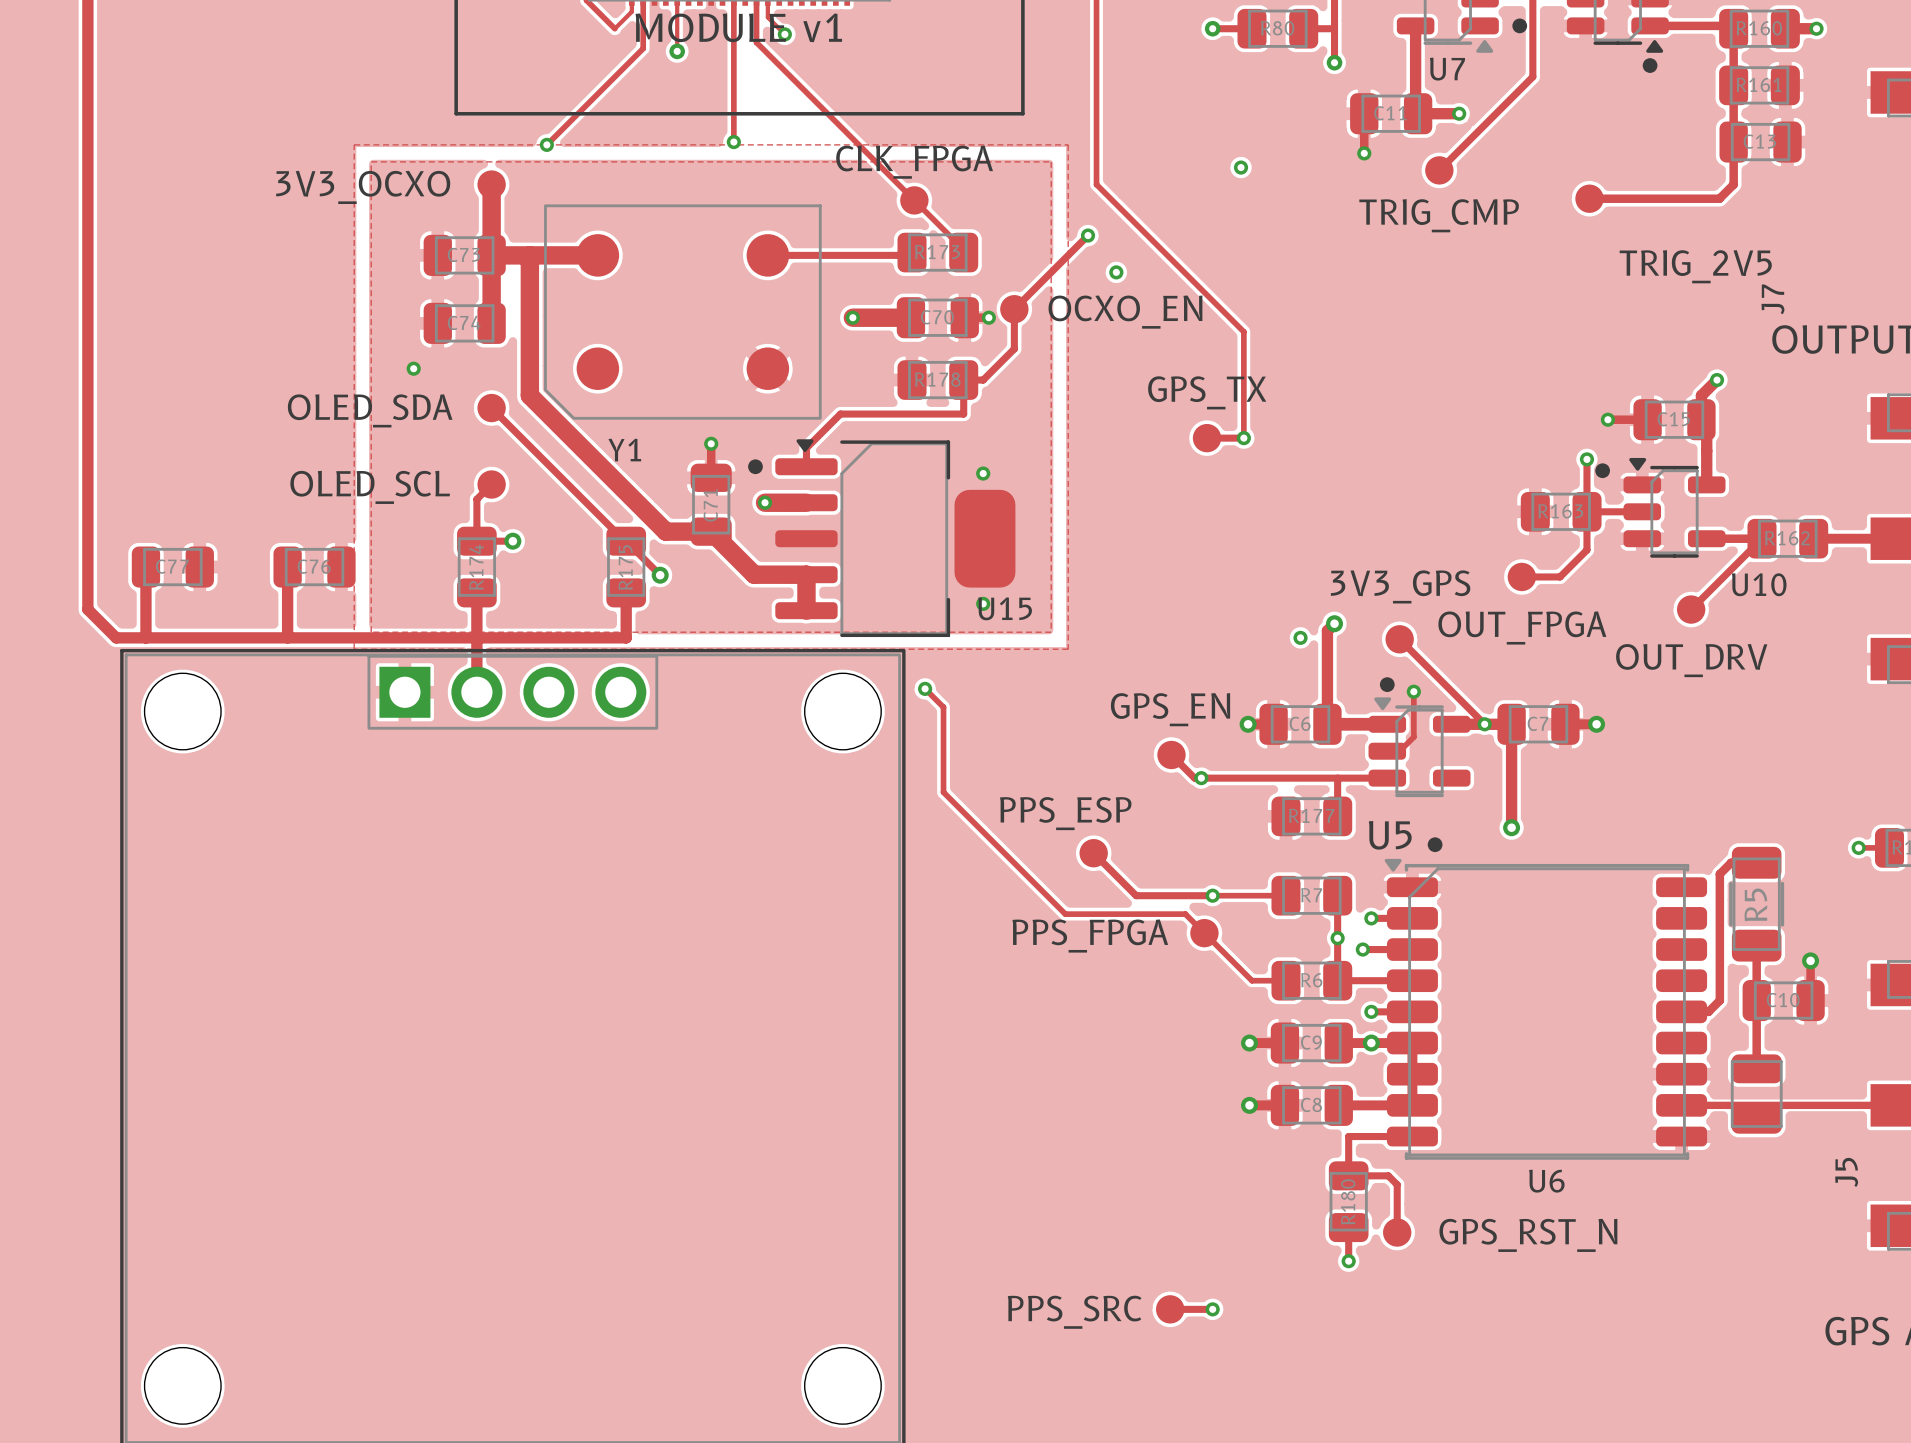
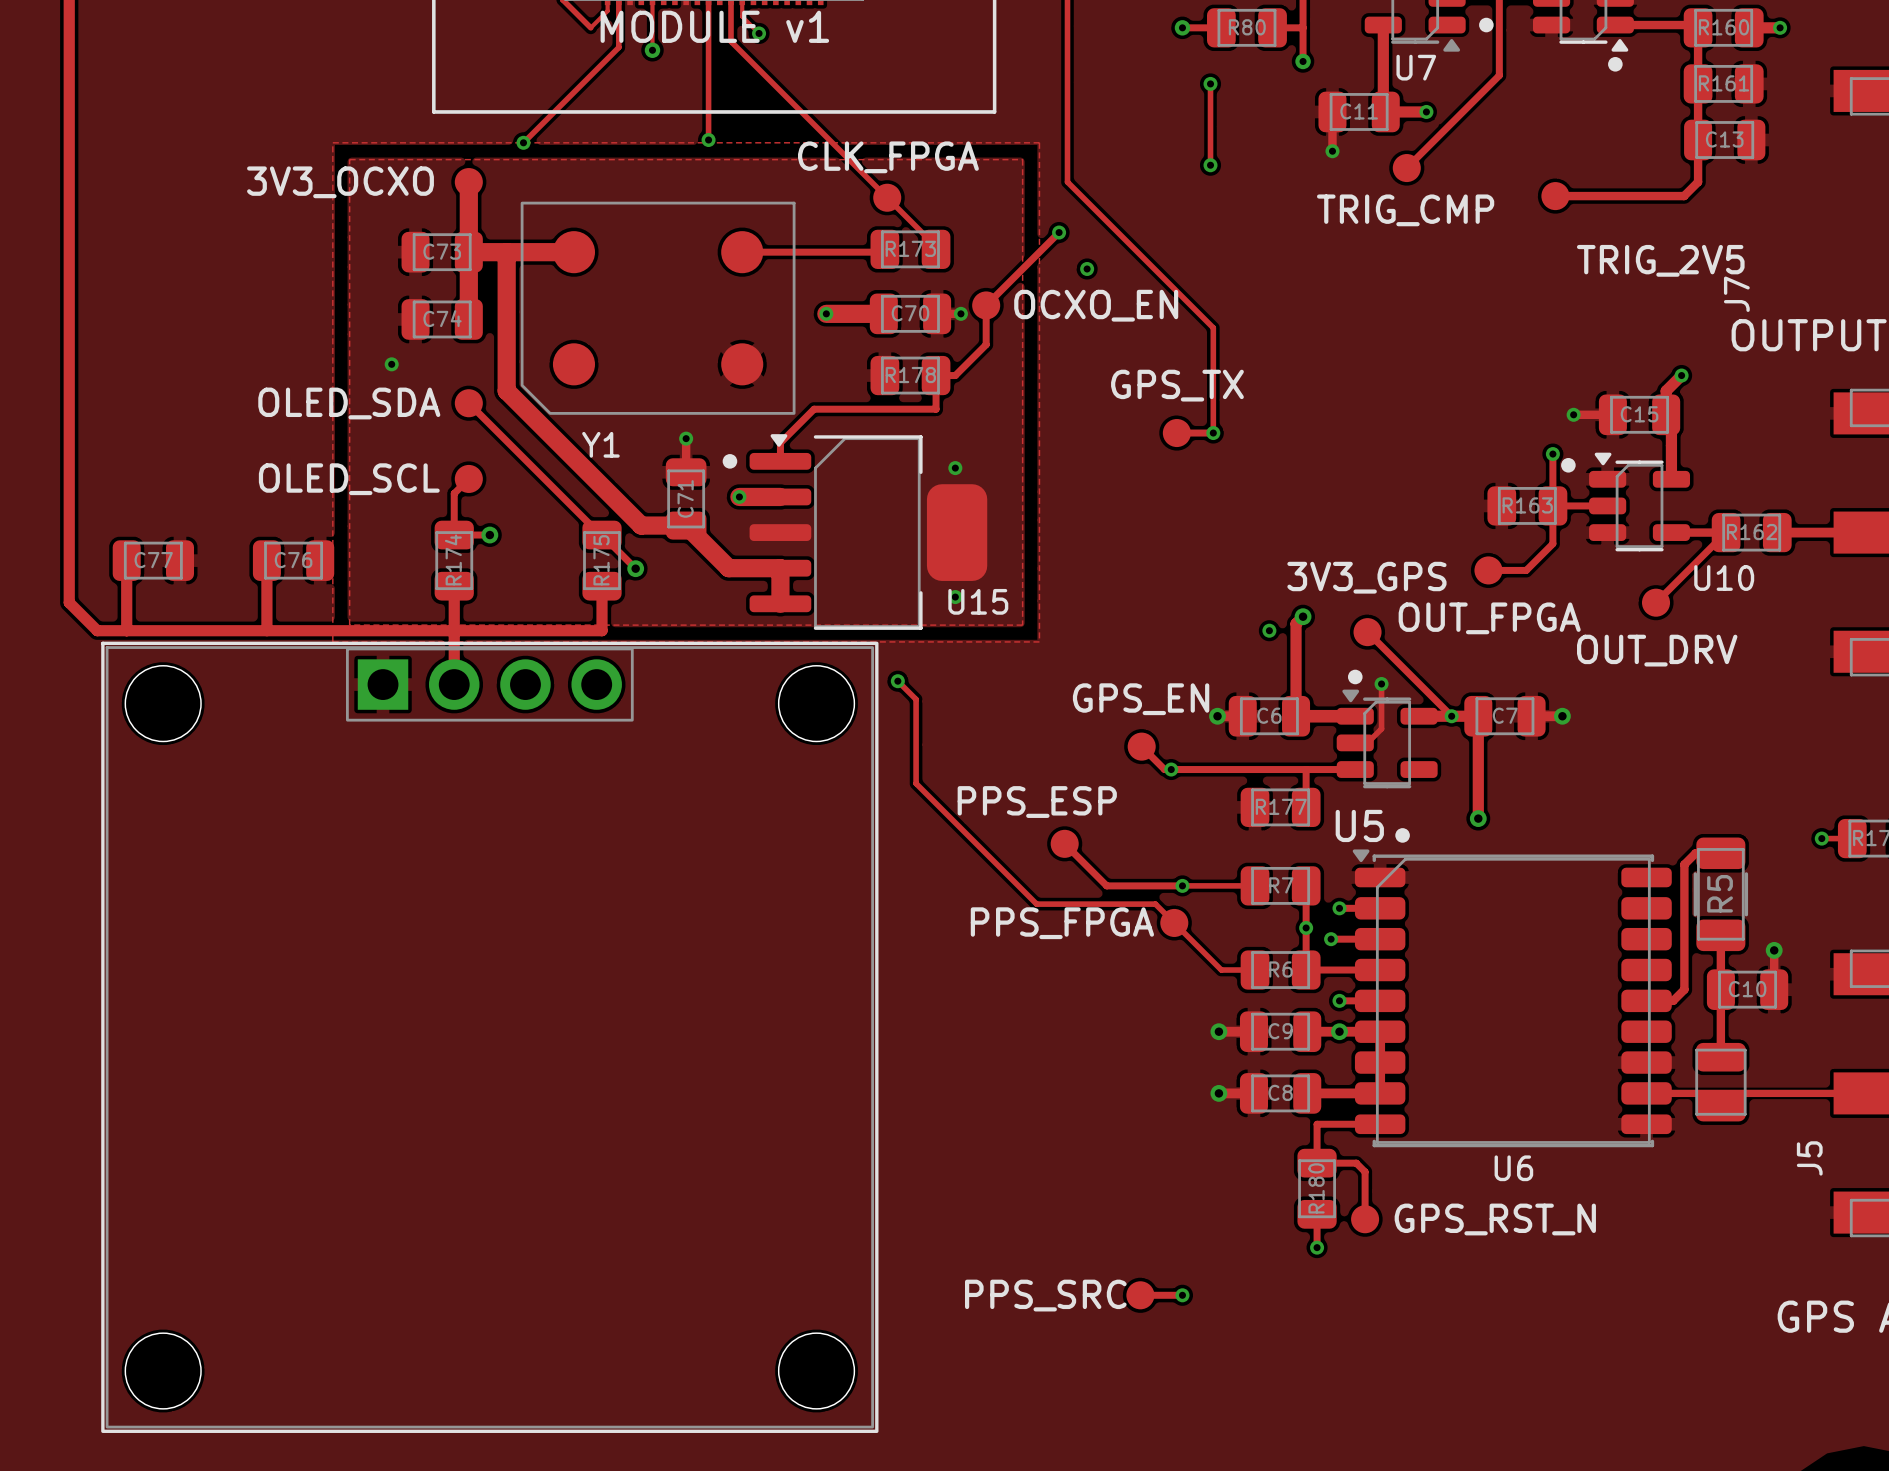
track: none -> (1210, 83) (1210, 165)
via: none -> (1210, 83)

